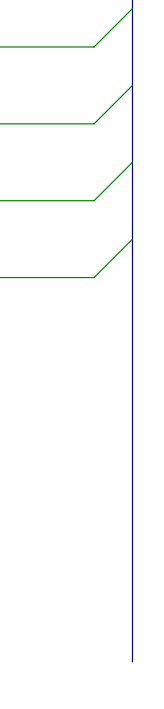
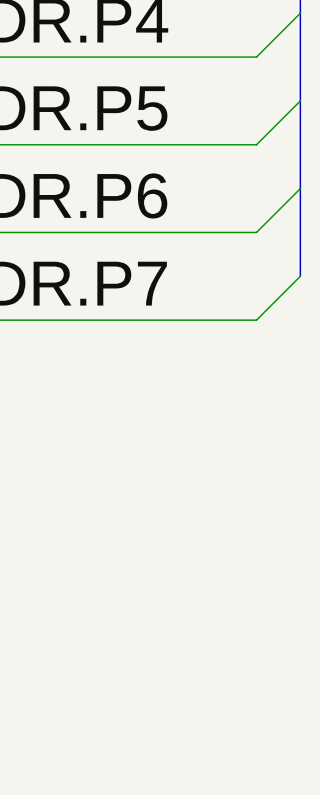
bus: (132, 239) (132, 661) -> none

